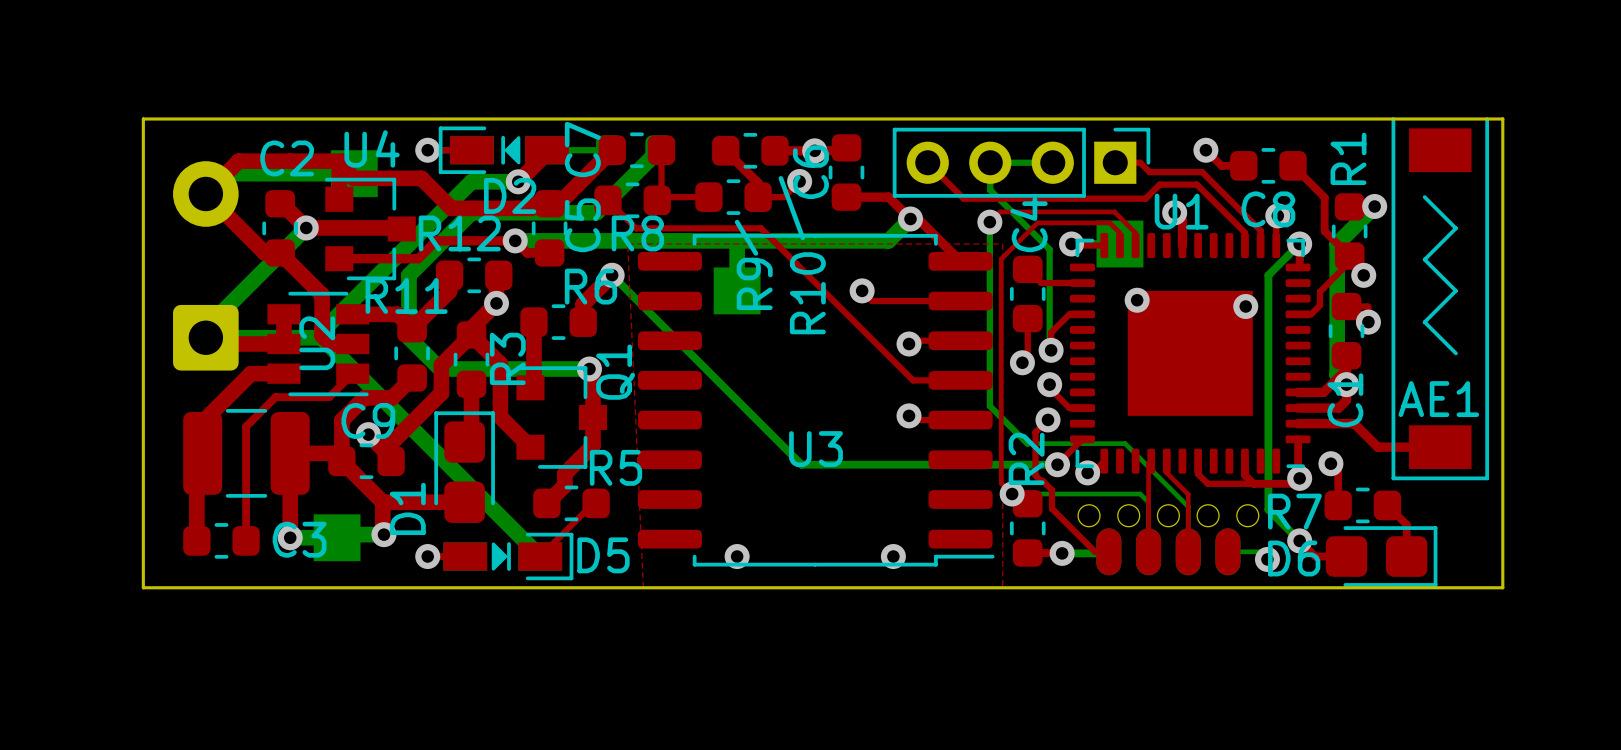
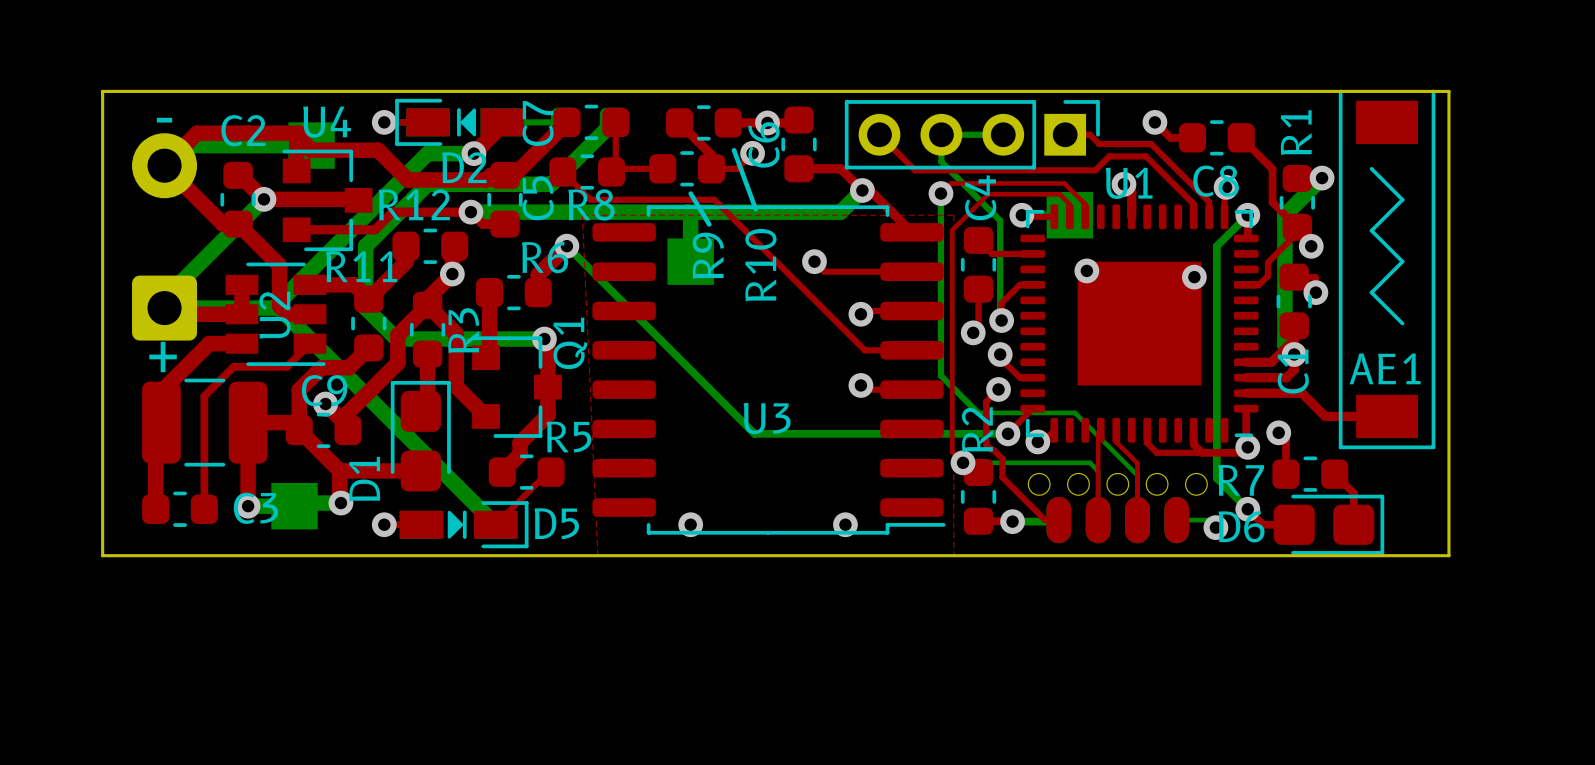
text: none -> - (164, 120)
text: none -> + (163, 357)

